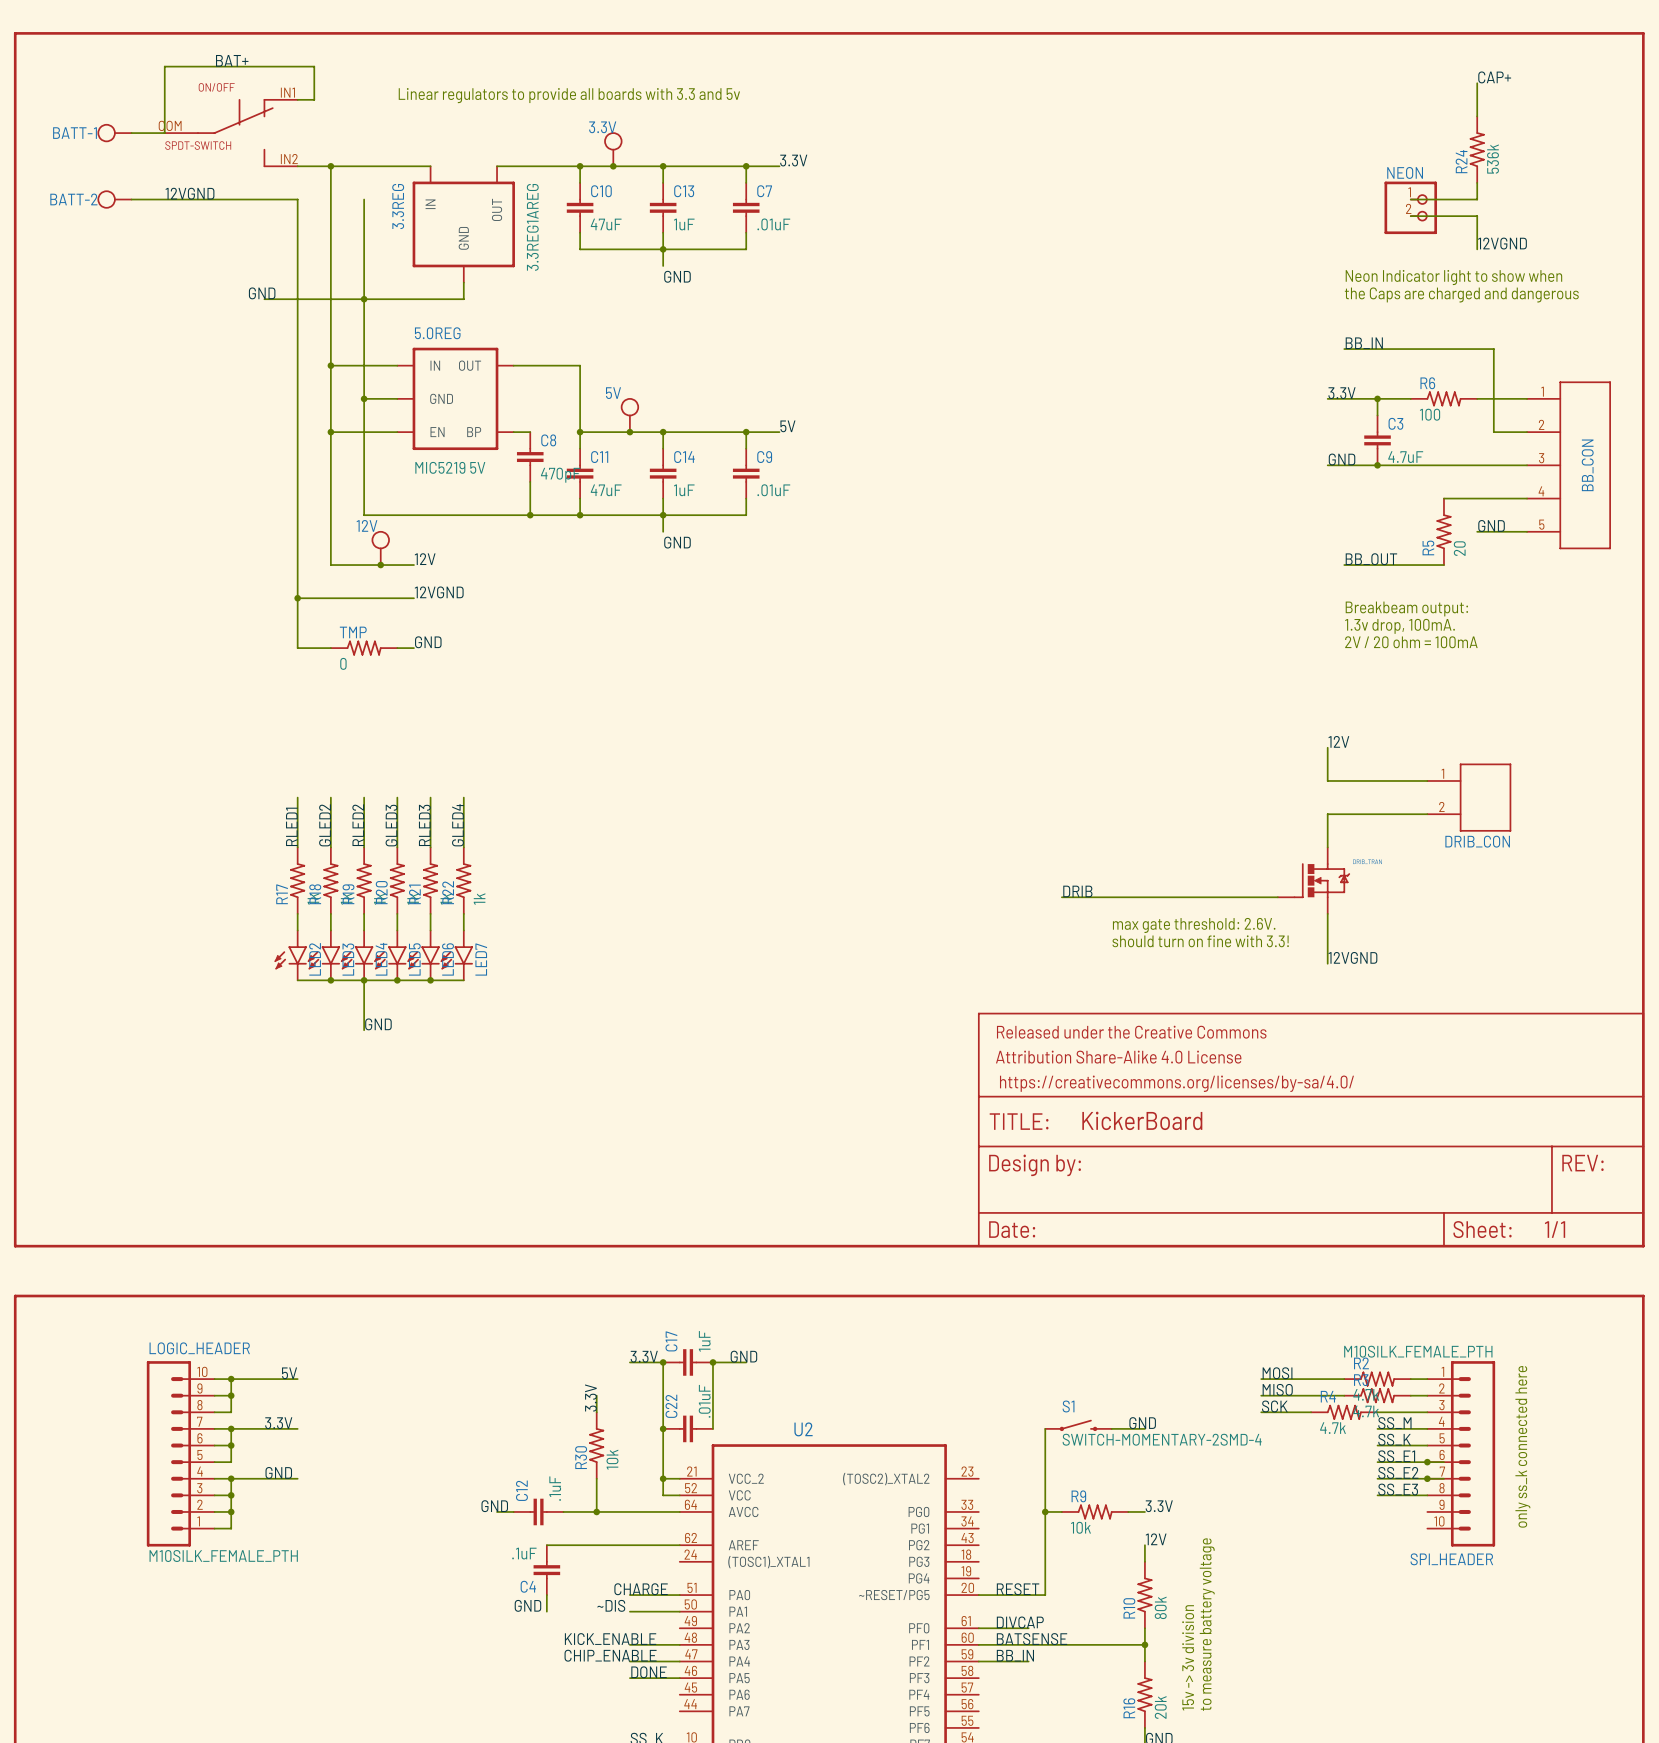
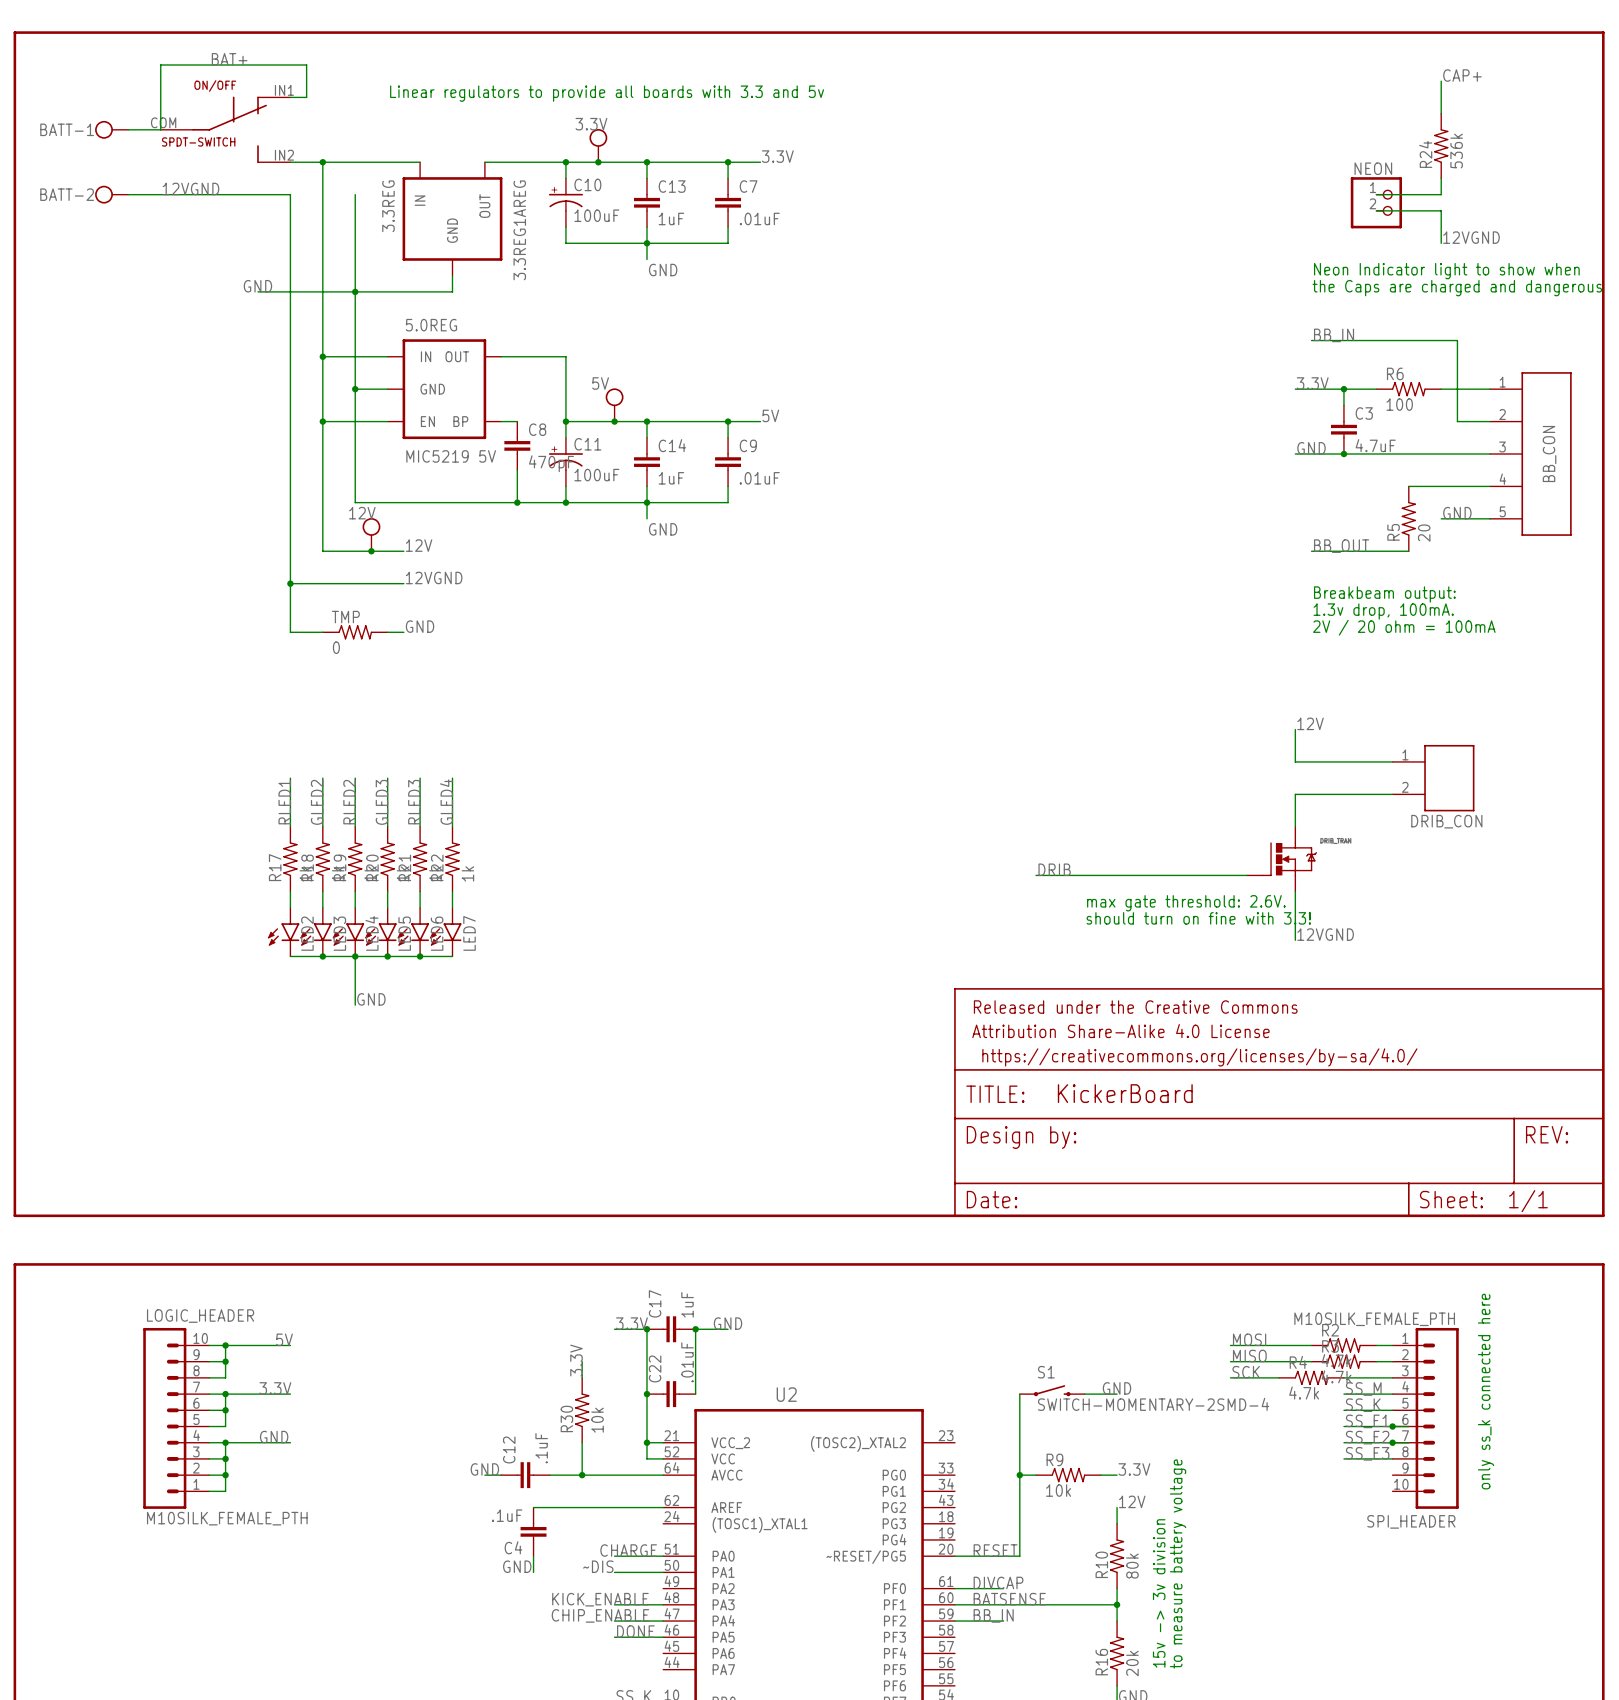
C10 symbol: [566, 182, 594, 233] -> [548, 178, 583, 228]
C10 value: 47uF (606, 224) -> 100uF (596, 215)
C11 symbol: [566, 448, 594, 499] -> [548, 437, 583, 487]
C11 value: 47uF (606, 490) -> 100uF (596, 475)

